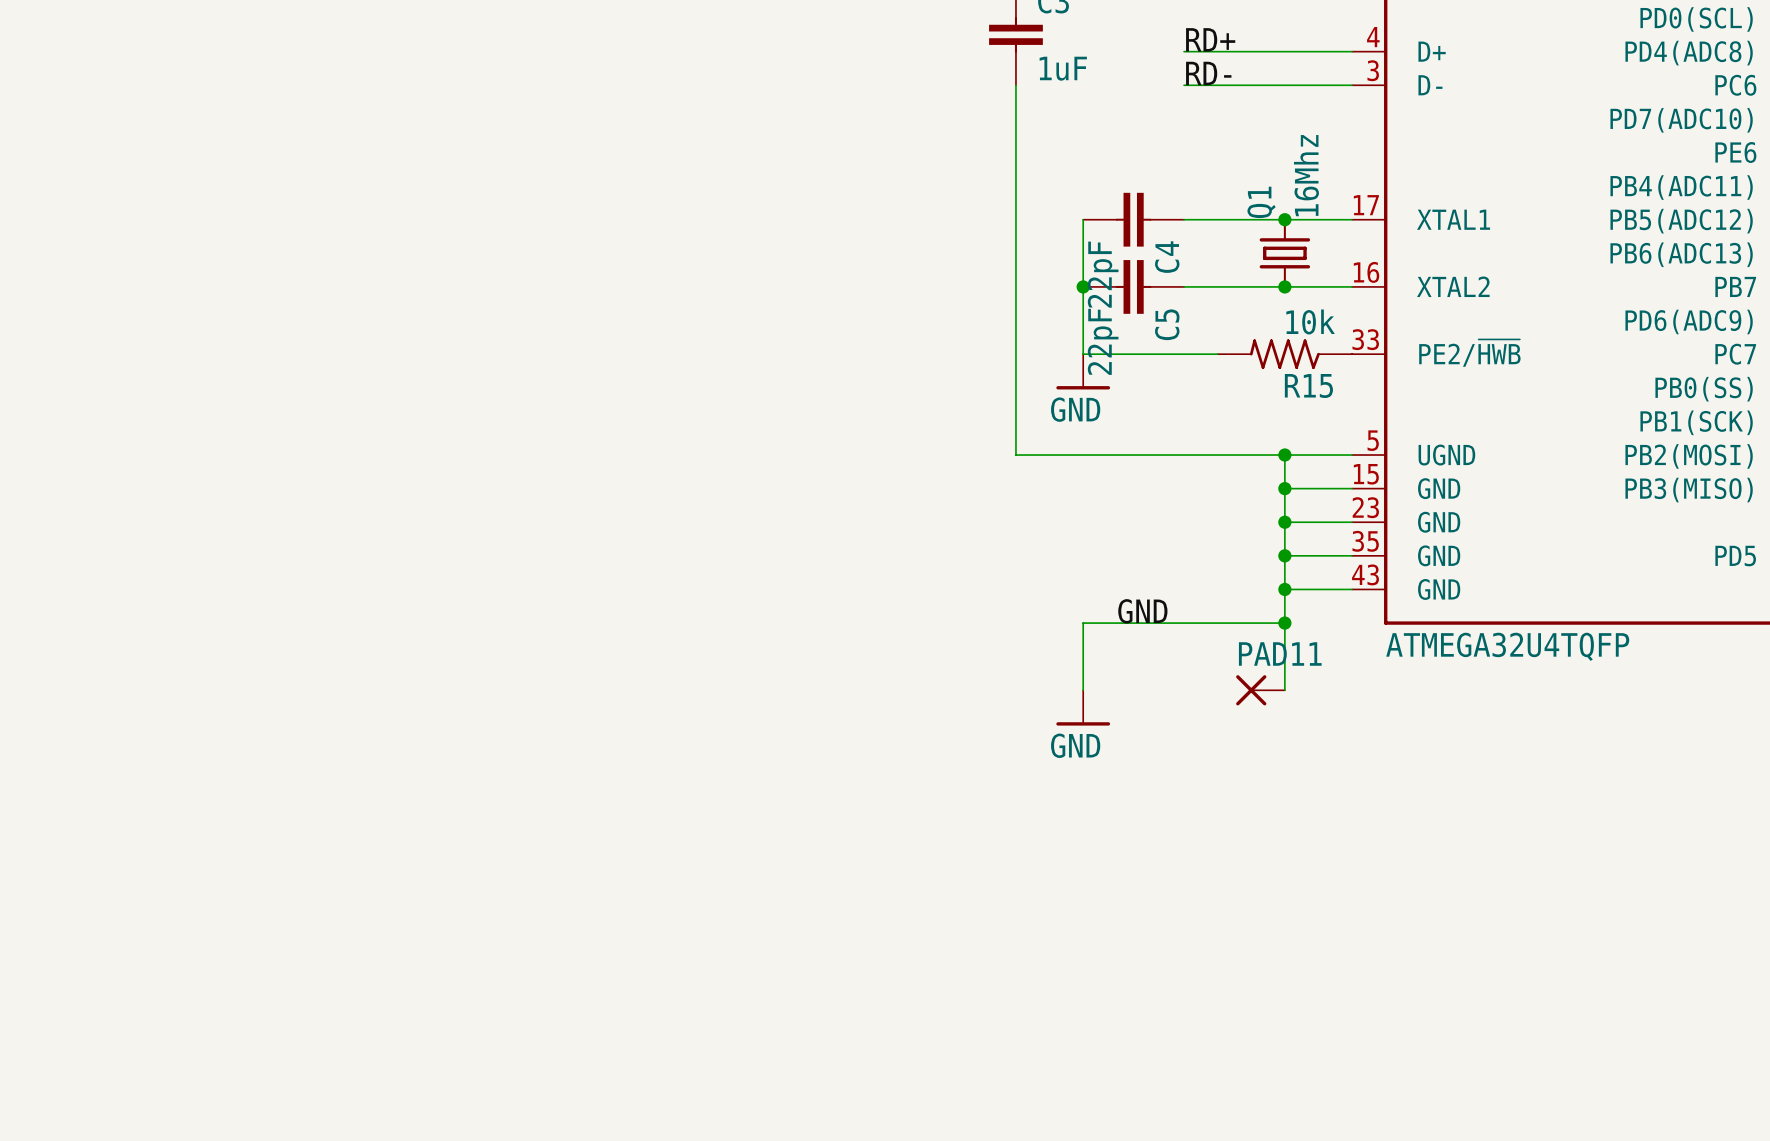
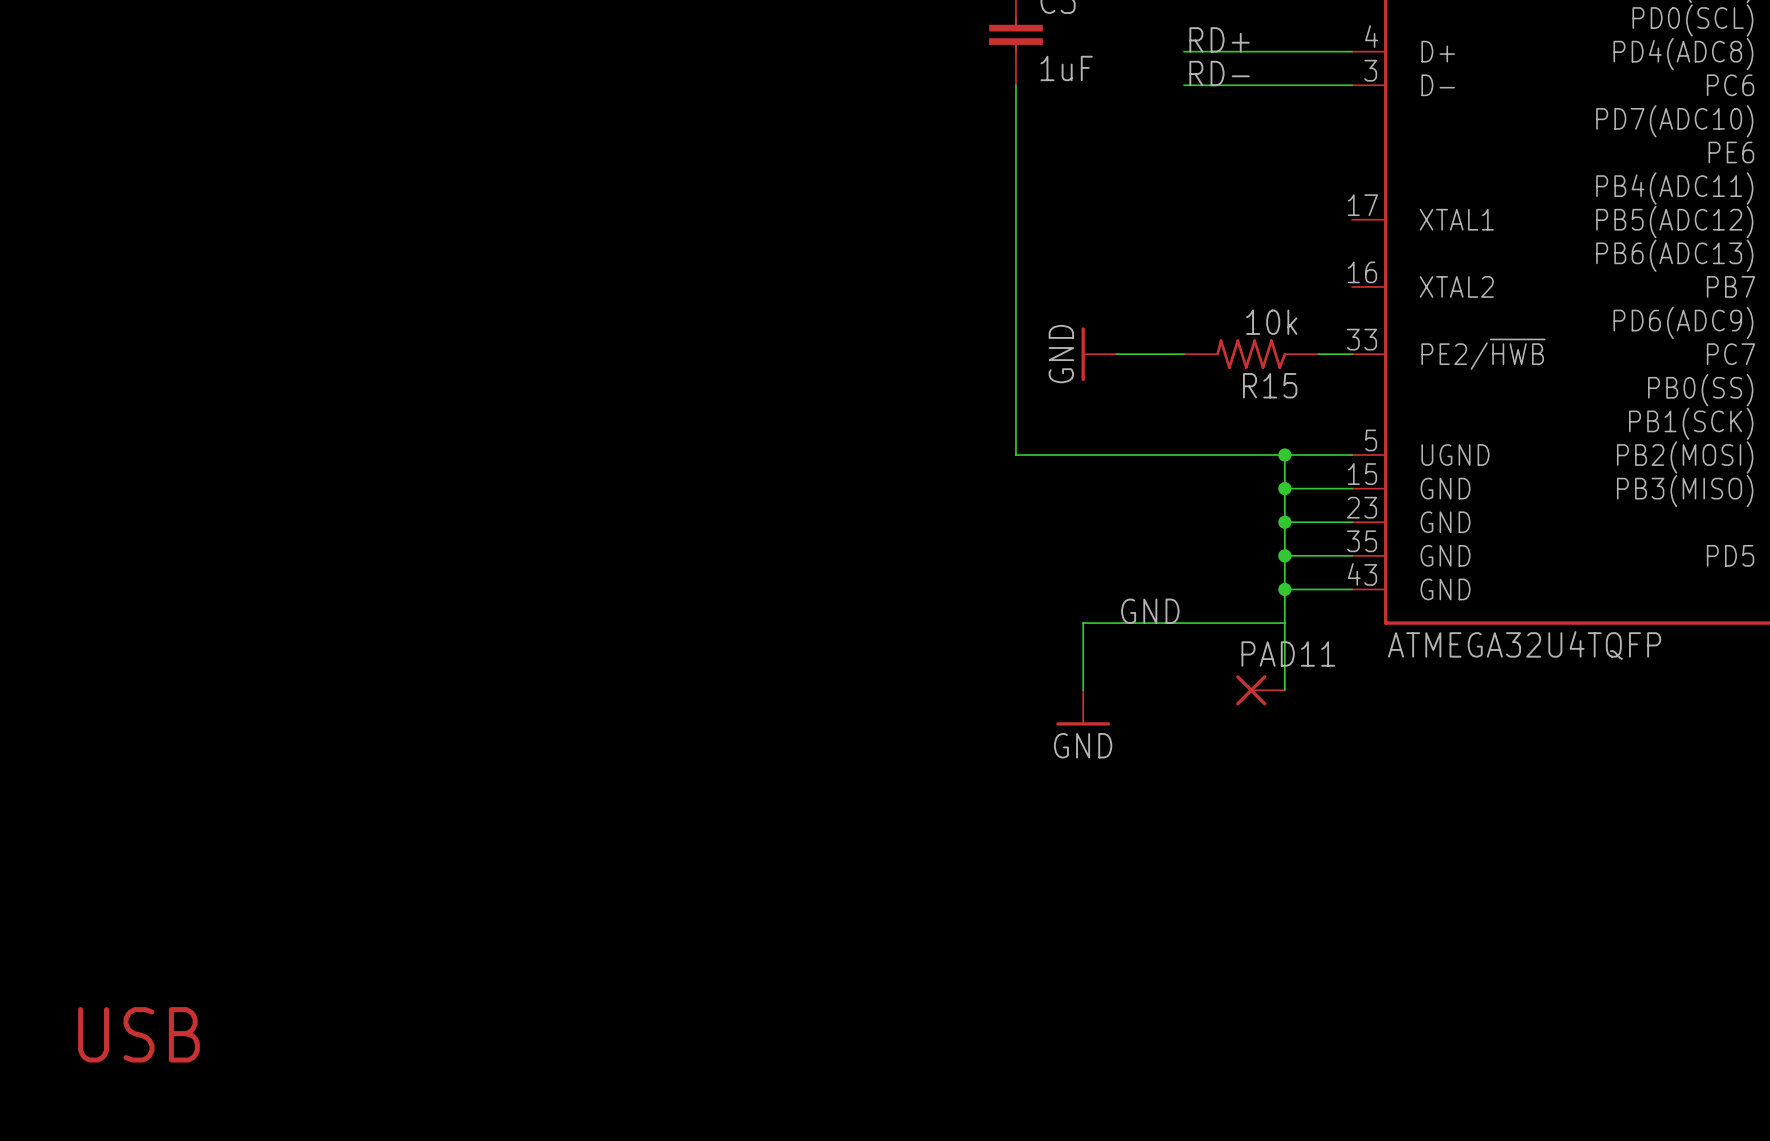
wire: (1083, 219) (1083, 354) (1116, 354) -> none
C4: 22pF (1133, 219) -> none
wire: (1184, 219) (1352, 219) -> none
junction: (1284, 219) -> none
Q1: 16Mhz (1284, 253) -> none
junction: (1083, 286) -> none
C5: 22pF (1133, 286) -> none
wire: (1184, 286) (1352, 286) -> none
junction: (1284, 286) -> none
R15 position: (1284, 354) -> (1251, 354)
power symbol rotation: 0° (1083, 387) -> 90° clockwise (1083, 354)
junction: (1284, 623) -> none
text: none -> USB (138, 1034)

